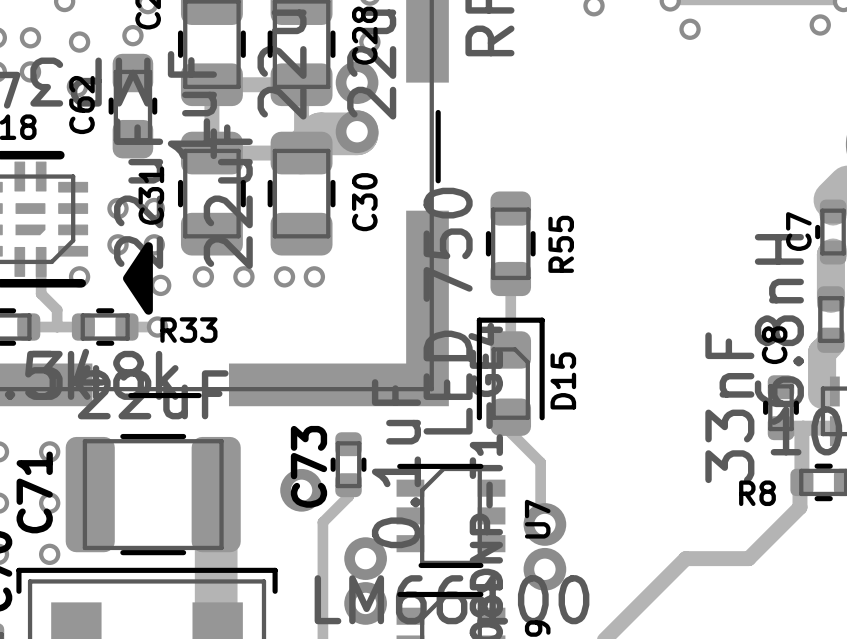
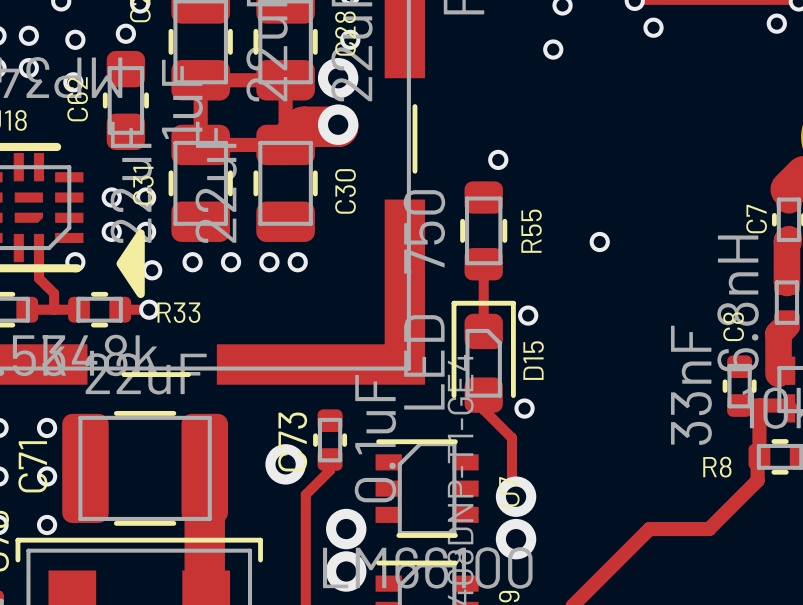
via: none -> (553, 49)
via: none -> (498, 159)
via: none -> (599, 241)
via: none -> (528, 315)
via: none -> (524, 408)

